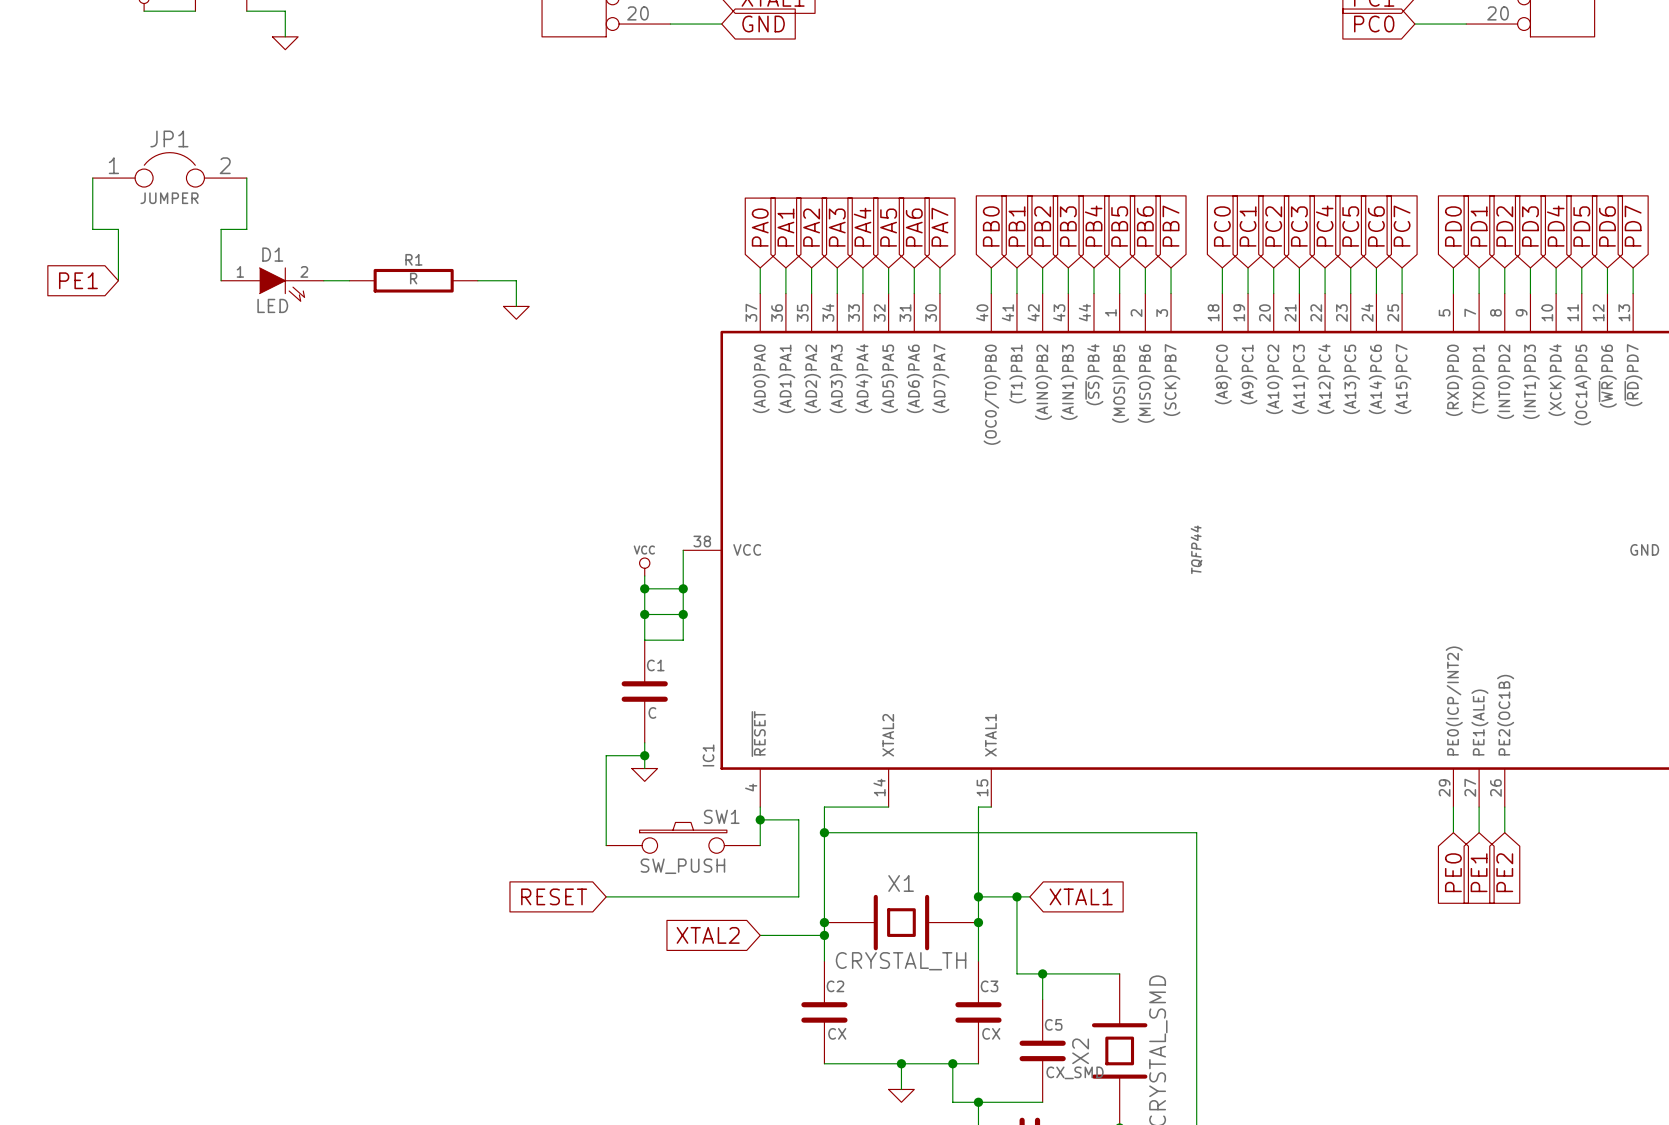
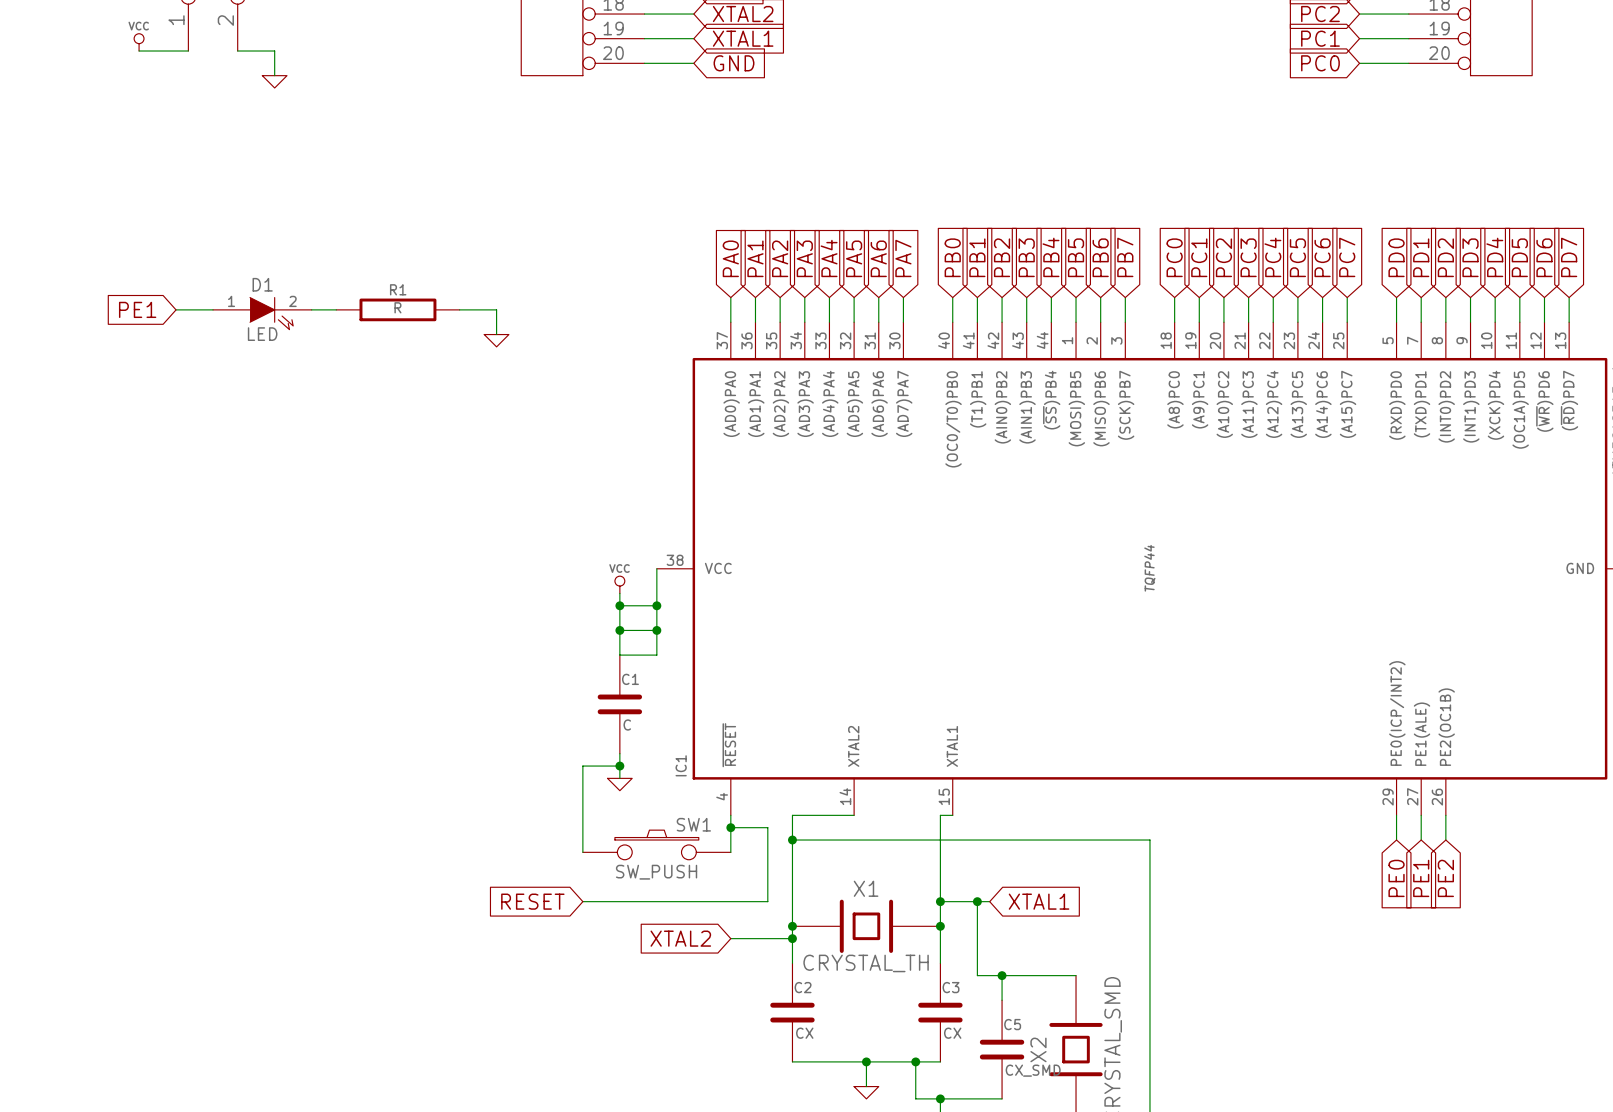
JP1: JUMPER (169, 169) -> none
wire: (92, 178) (92, 229) (118, 229) (118, 280) -> none
wire: (246, 178) (246, 229) (221, 229) (221, 280) -> (176, 309) (213, 309)
global label position: PE1 (78, 280) -> PE1 (137, 309)

